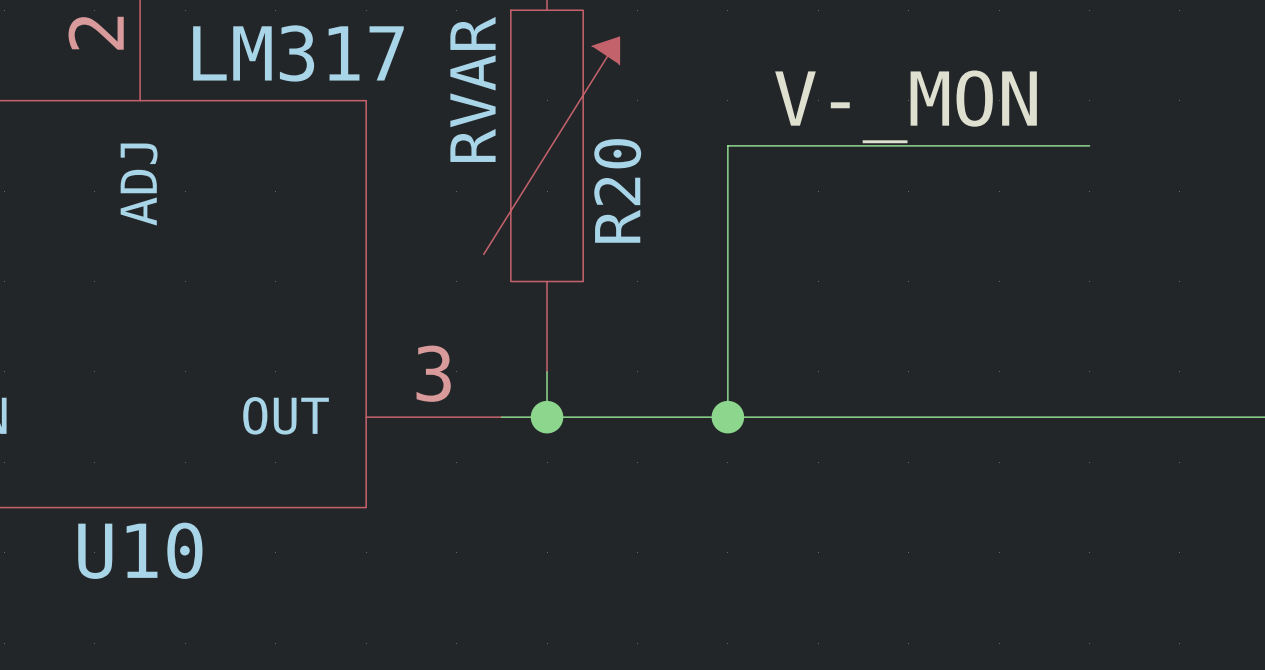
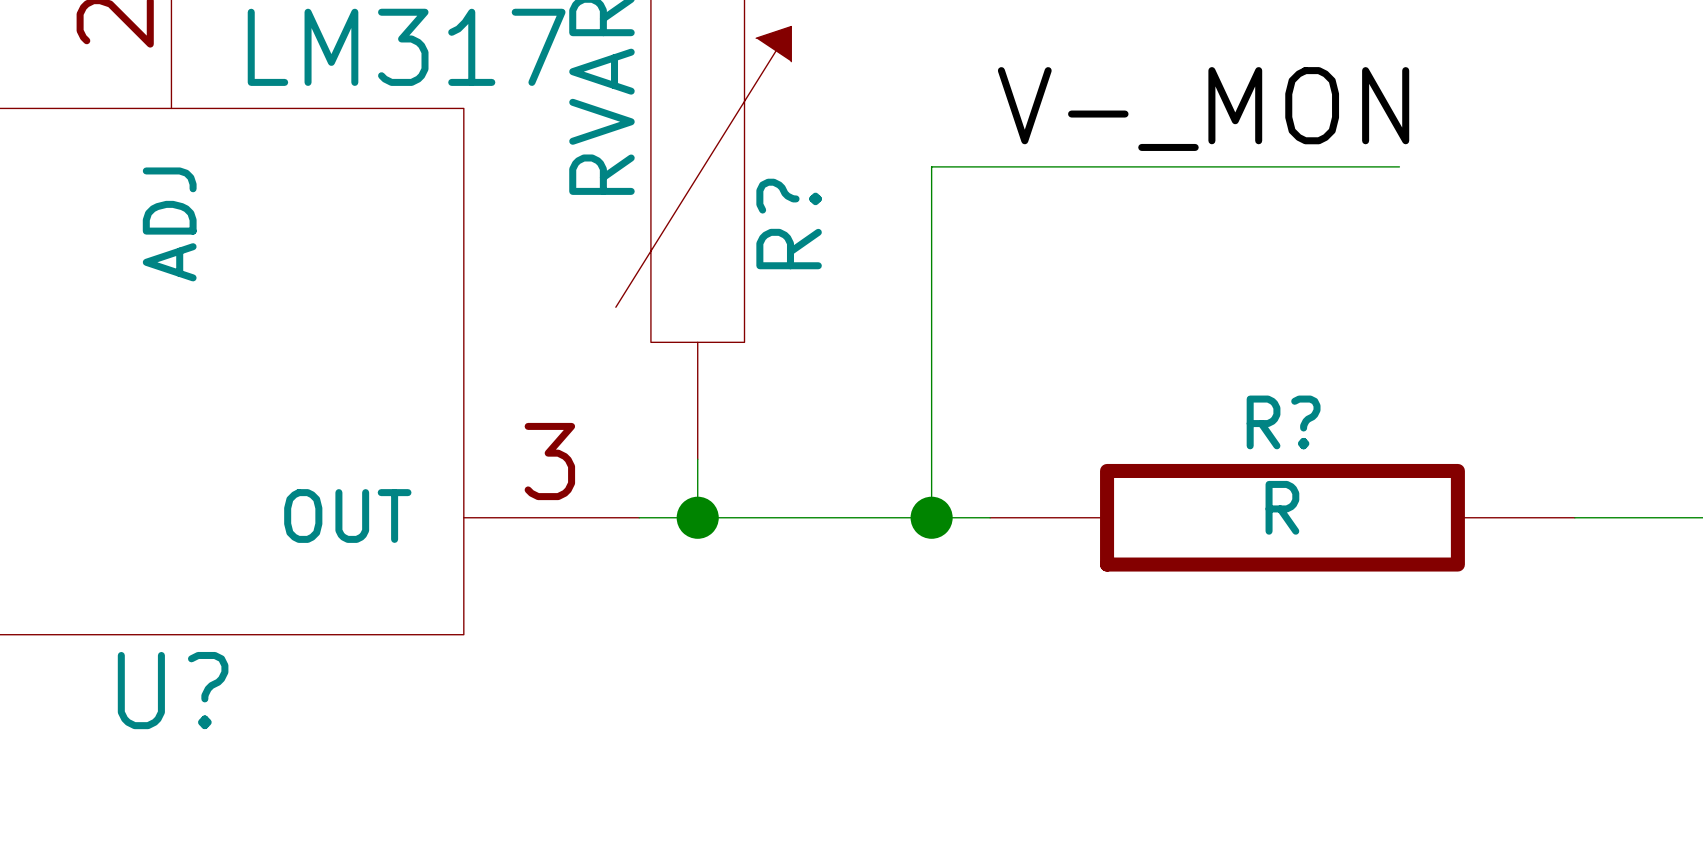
R20 name: R20 (617, 190) -> R? (789, 223)
wire: (773, 417) (1225, 417) -> none
R?: none -> R (1282, 517)
U10 name: U10 (140, 550) -> U? (173, 690)

